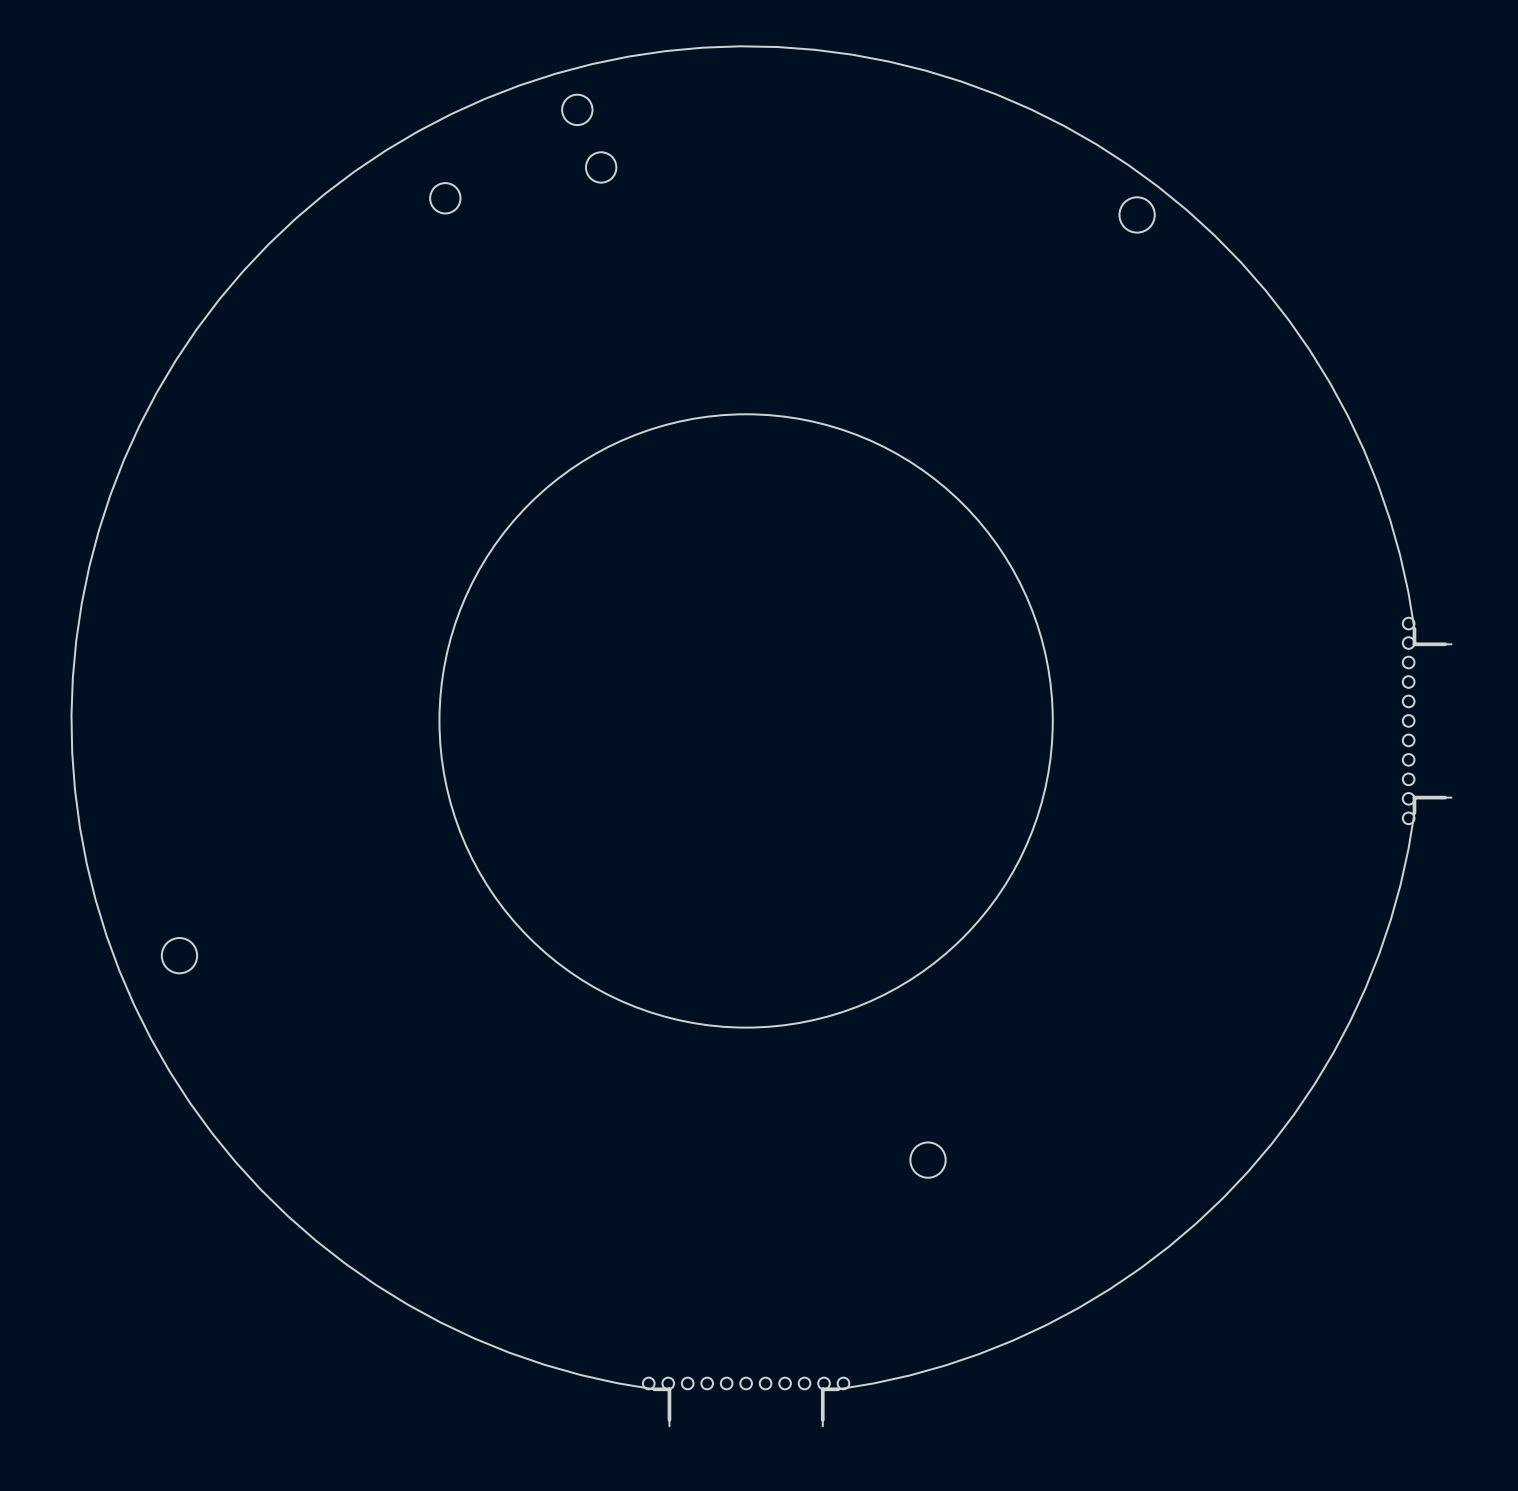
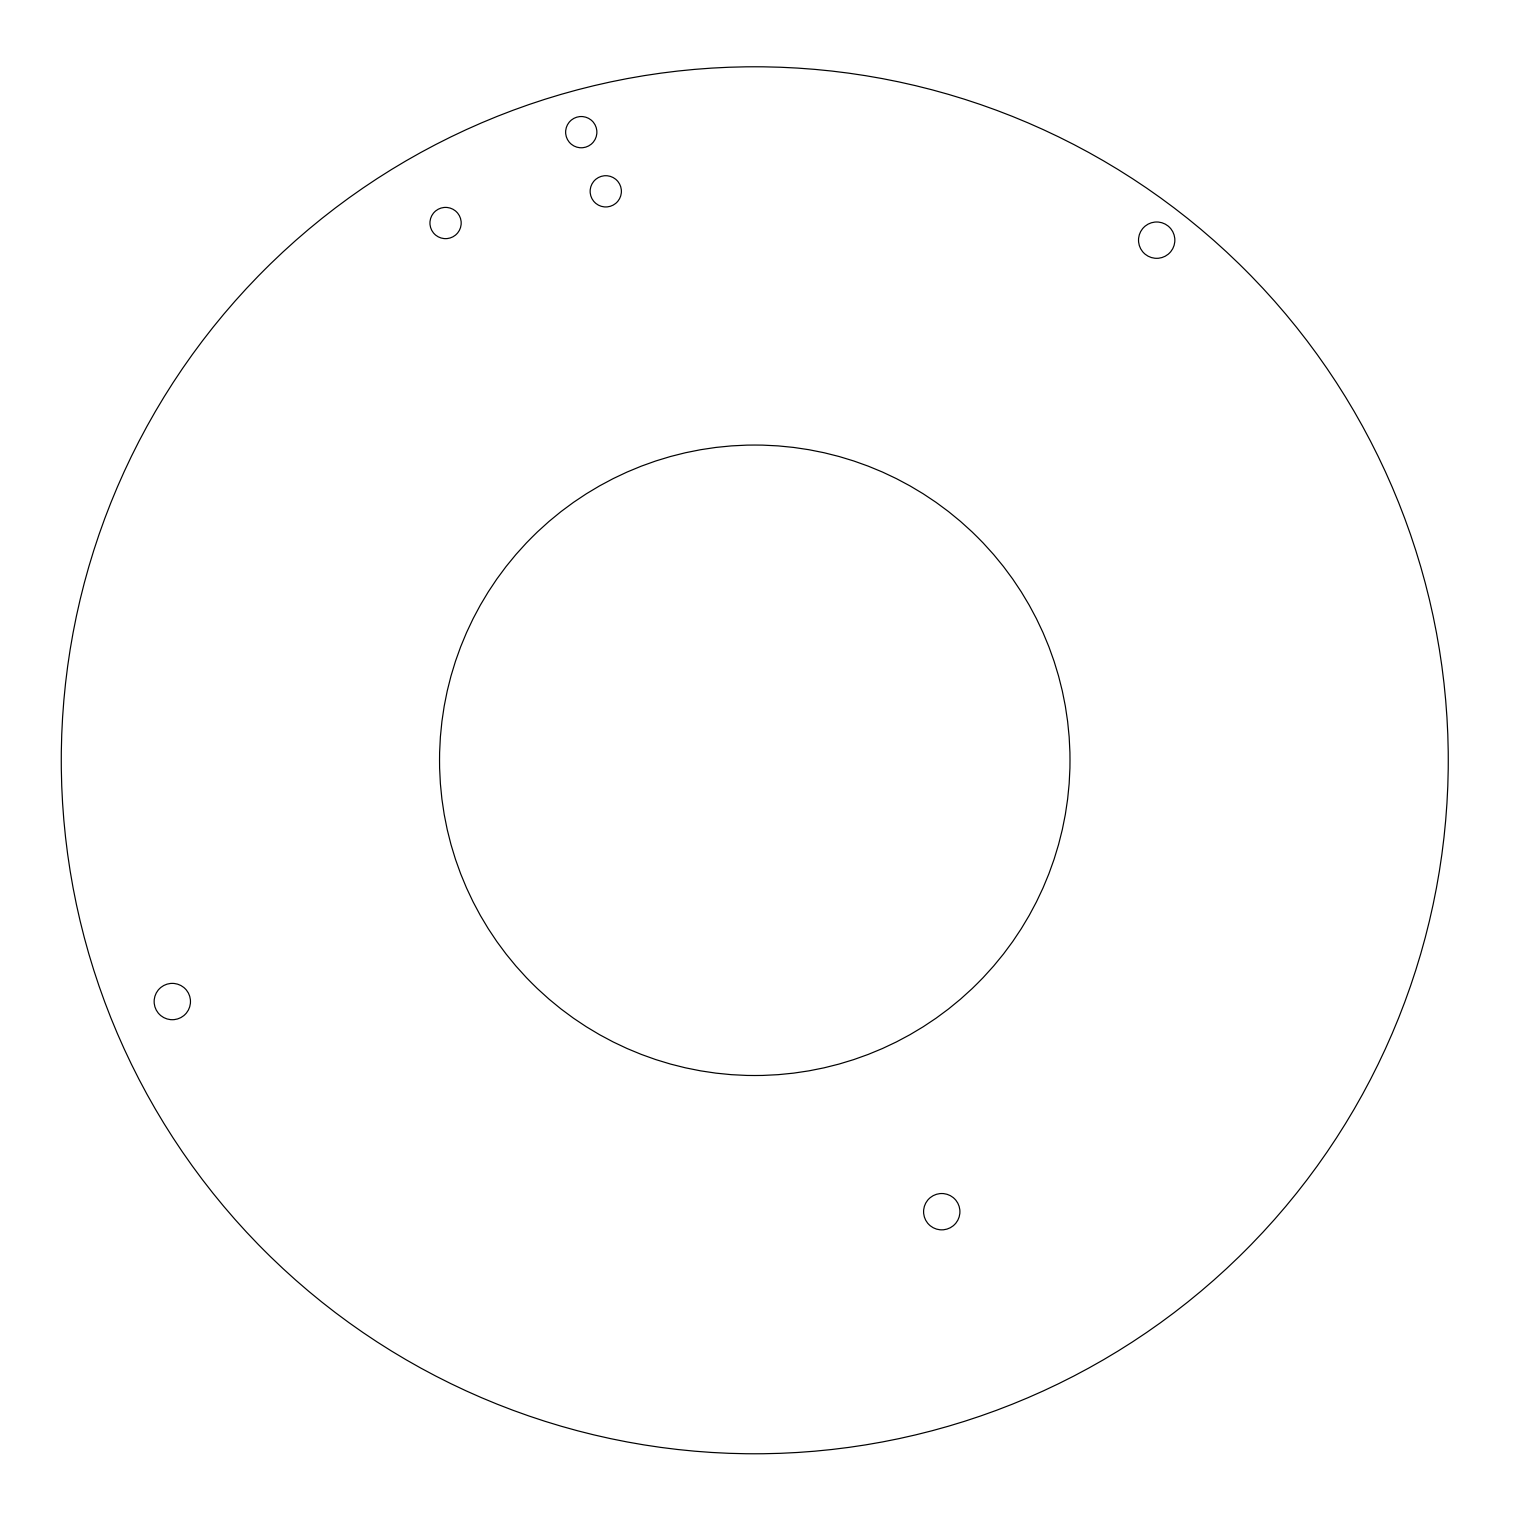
round board edge: none -> [60, 66, 1449, 1455]
board edge: (1414, 628) (1400, 555) (1377, 484) (1363, 449) (1347, 415) (1310, 350) (1265, 290) (1214, 235) (1187, 210) (1128, 164) (1064, 125) (1030, 109) (961, 81) (888, 61) (815, 49) (777, 47) (702, 47) (628, 56) (591, 64) (520, 85) (485, 98) (417, 131) (354, 171) (324, 193) (269, 243) (219, 299) (175, 360) (156, 392) (139, 425) (110, 494) (89, 566) (81, 603) (72, 677) (72, 752) (79, 827) (95, 900) (106, 935) (119, 971) (151, 1038) (189, 1102) (235, 1162) (287, 1215) (315, 1240) (376, 1285) (440, 1322) (474, 1338) (544, 1364) (580, 1375) (654, 1389) -> none
board edge: (1451, 644) (1445, 644) -> none
part: (1424, 720) -> none
board edge: (1451, 797) (1445, 797) -> none
board edge: (1414, 812) (1400, 884) (1390, 919) (1379, 954) (1350, 1021) (1314, 1084) (1293, 1114) (1271, 1143) (1223, 1198) (1168, 1246) (1139, 1268) (1109, 1289) (1046, 1325) (1013, 1340) (944, 1365) (874, 1383) (838, 1389) -> none
part: (746, 1399) -> none
board edge: (669, 1419) (669, 1426) -> none
board edge: (822, 1419) (822, 1426) -> none

